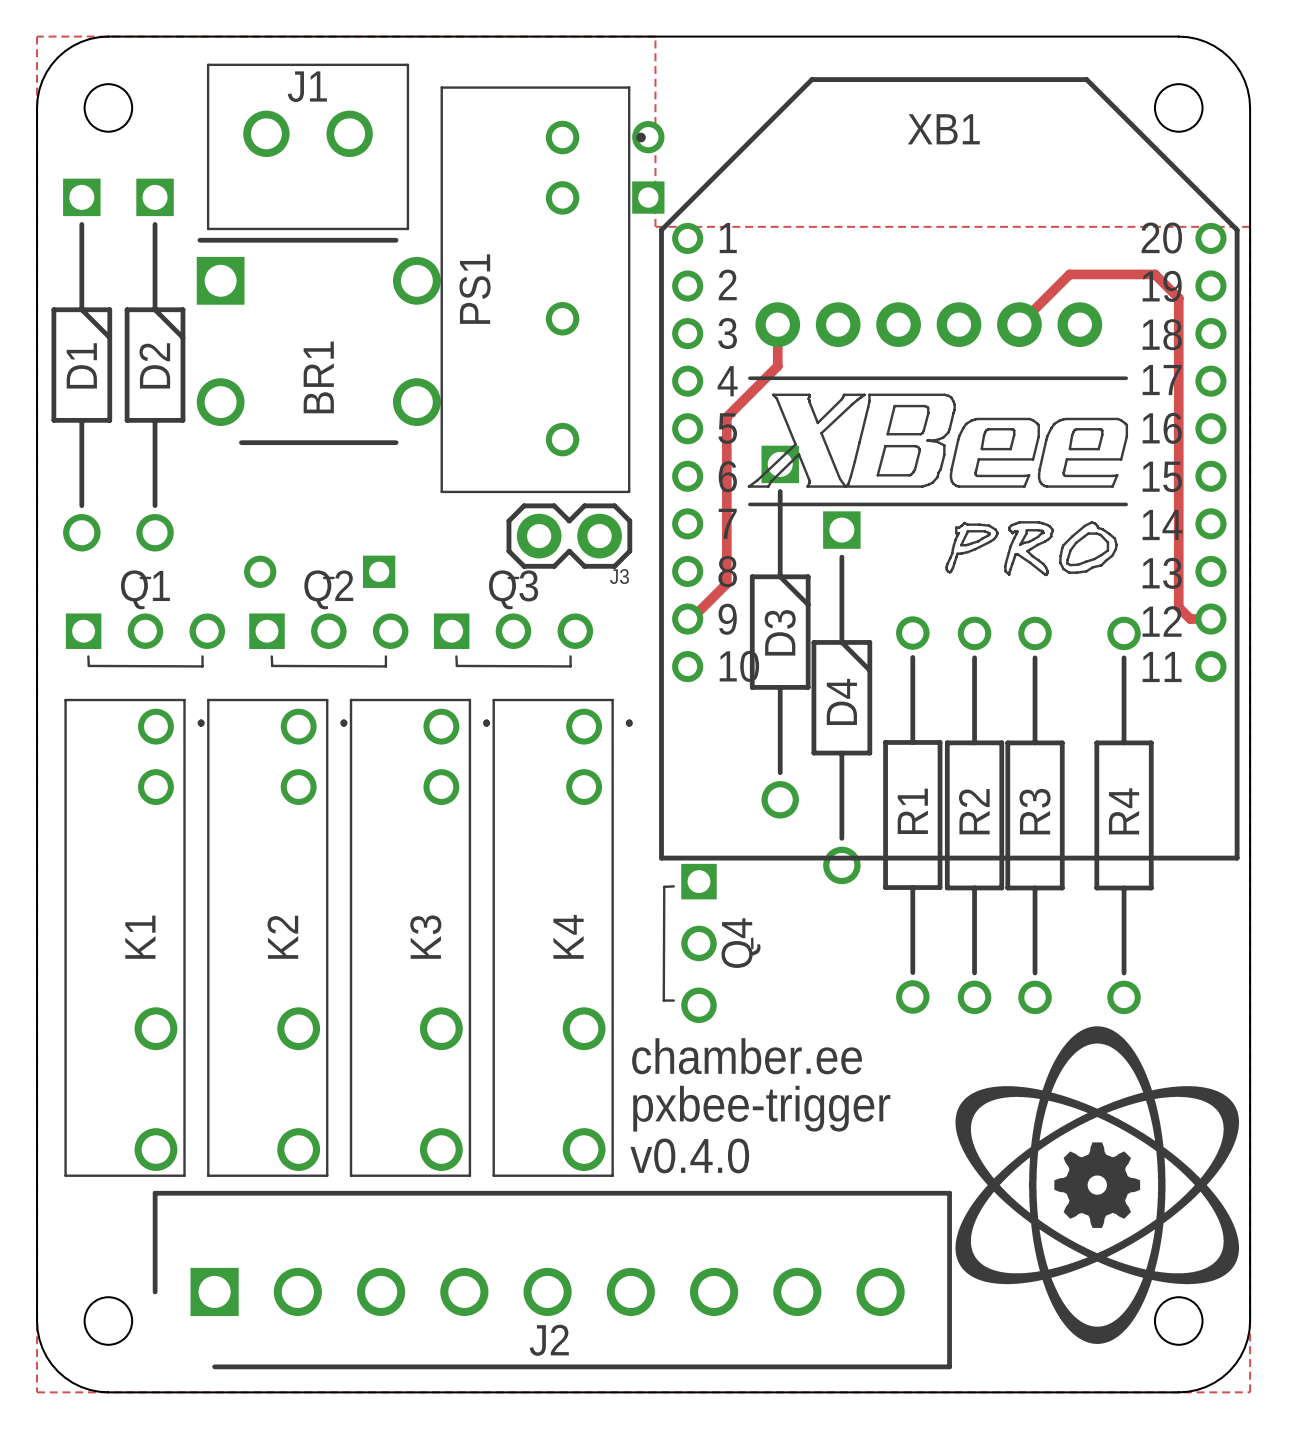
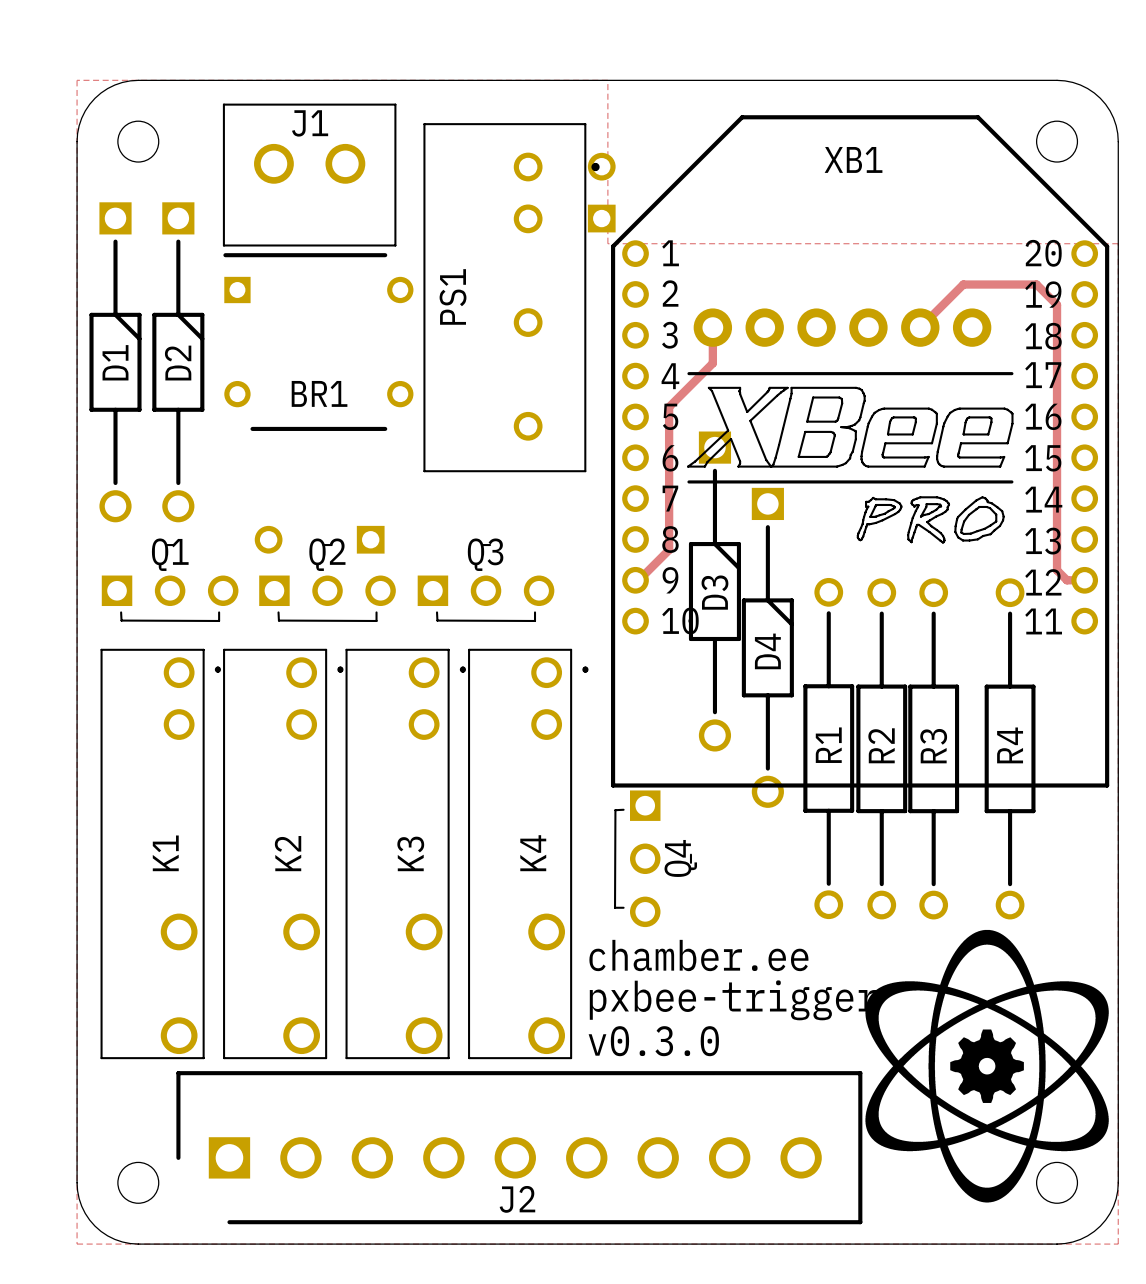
BR1 footprint: [196, 237, 441, 446] -> [223, 253, 414, 431]
BR1 name rotation: 0° (318, 377) -> 90° clockwise (319, 393)
J3: (569, 536) -> none
text: v0.4.0 (689, 1155) -> v0.3.0 (653, 1041)

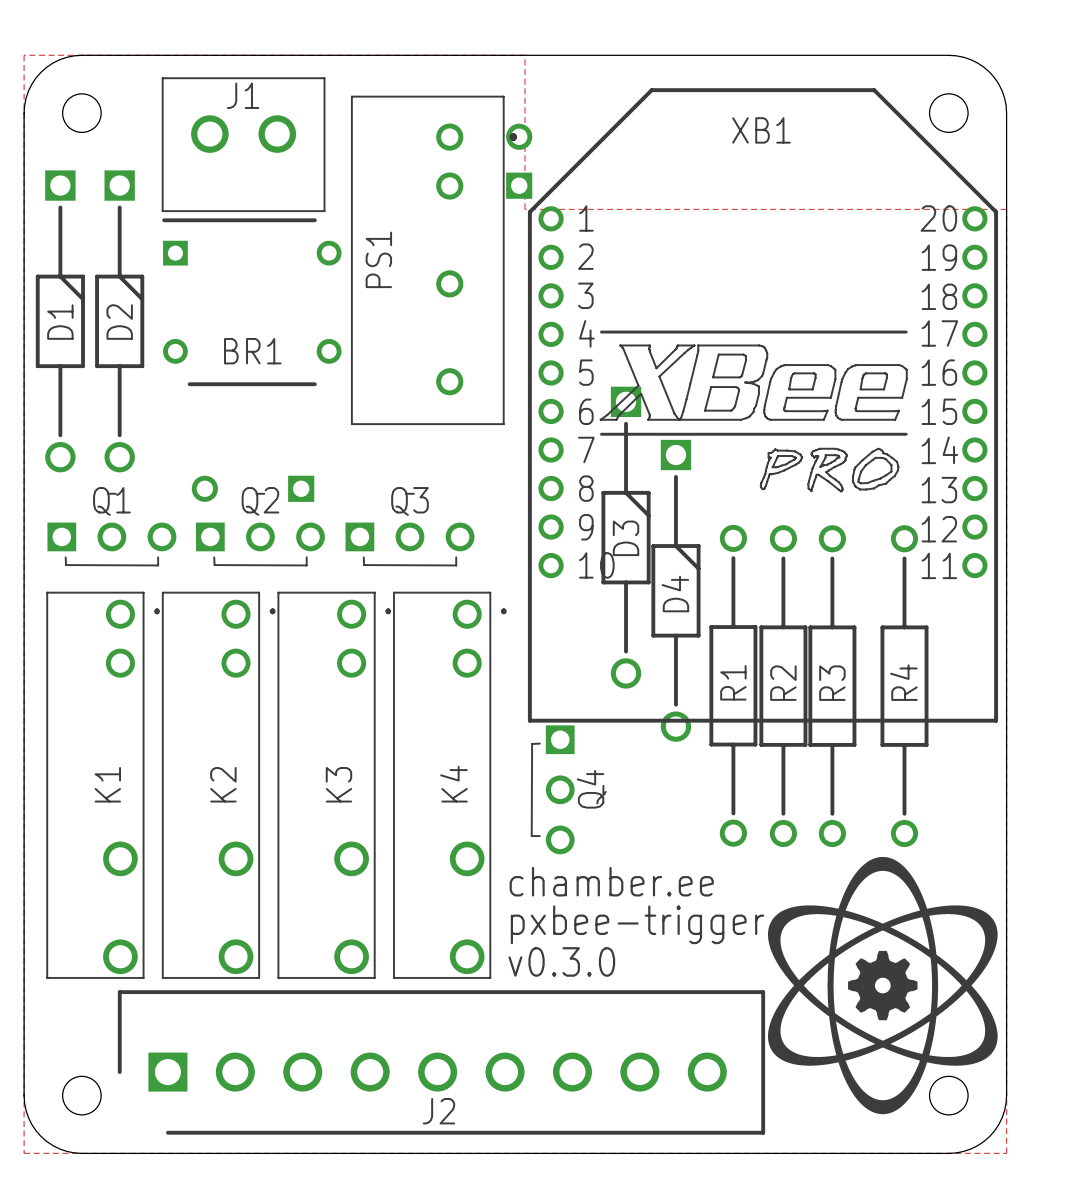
track: (712, 327) (712, 363) (669, 407) (669, 549) (638, 580) (635, 580) -> none
part: (842, 327) -> none
track: (920, 327) (963, 284) (1036, 284) (1057, 304) (1057, 570) (1066, 580) (1084, 580) -> none

